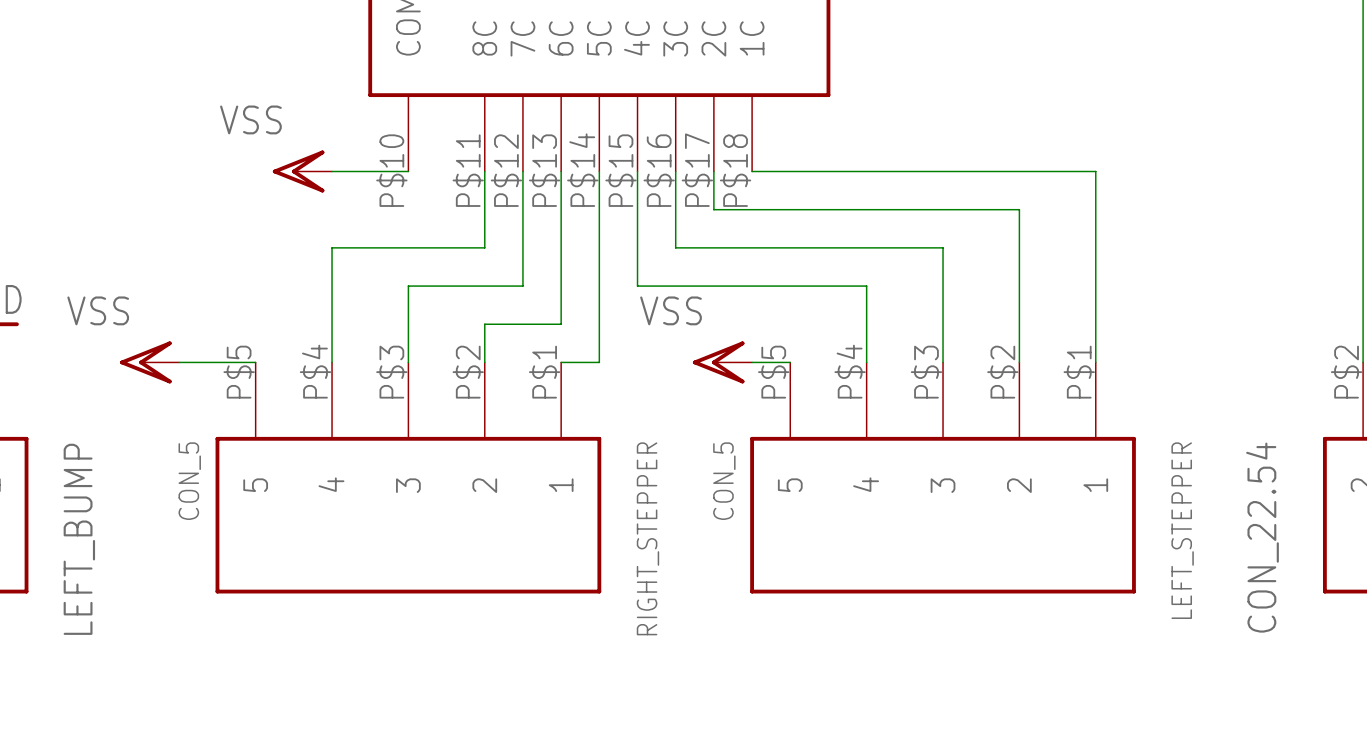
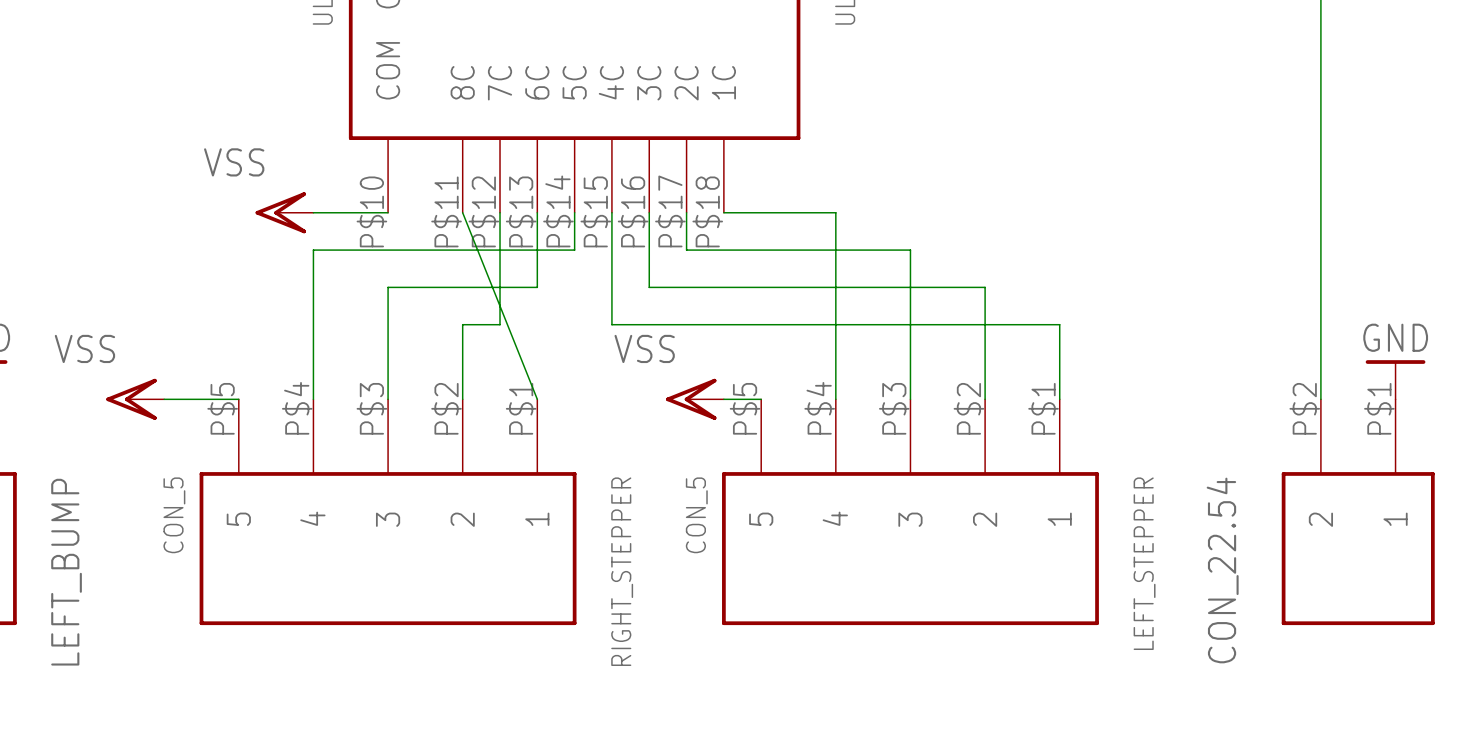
wire: (484, 171) (484, 247) -> none
wire: (866, 171) (1095, 171) (1095, 286) -> (835, 212) (835, 324) (1059, 324)
wire: (599, 209) (599, 362) (561, 362) -> (462, 212) (537, 399)
wire: (943, 209) (1019, 209) (1019, 247) -> (910, 250) (910, 287) (985, 287)
wire: (332, 247) (408, 247) -> (313, 287) (313, 250) (574, 250)
wire: (561, 247) (561, 324) (484, 324) -> (537, 287) (462, 287)
wire: (408, 286) (484, 286) -> (388, 324) (388, 287)
wire: none -> (462, 324) (462, 362)

